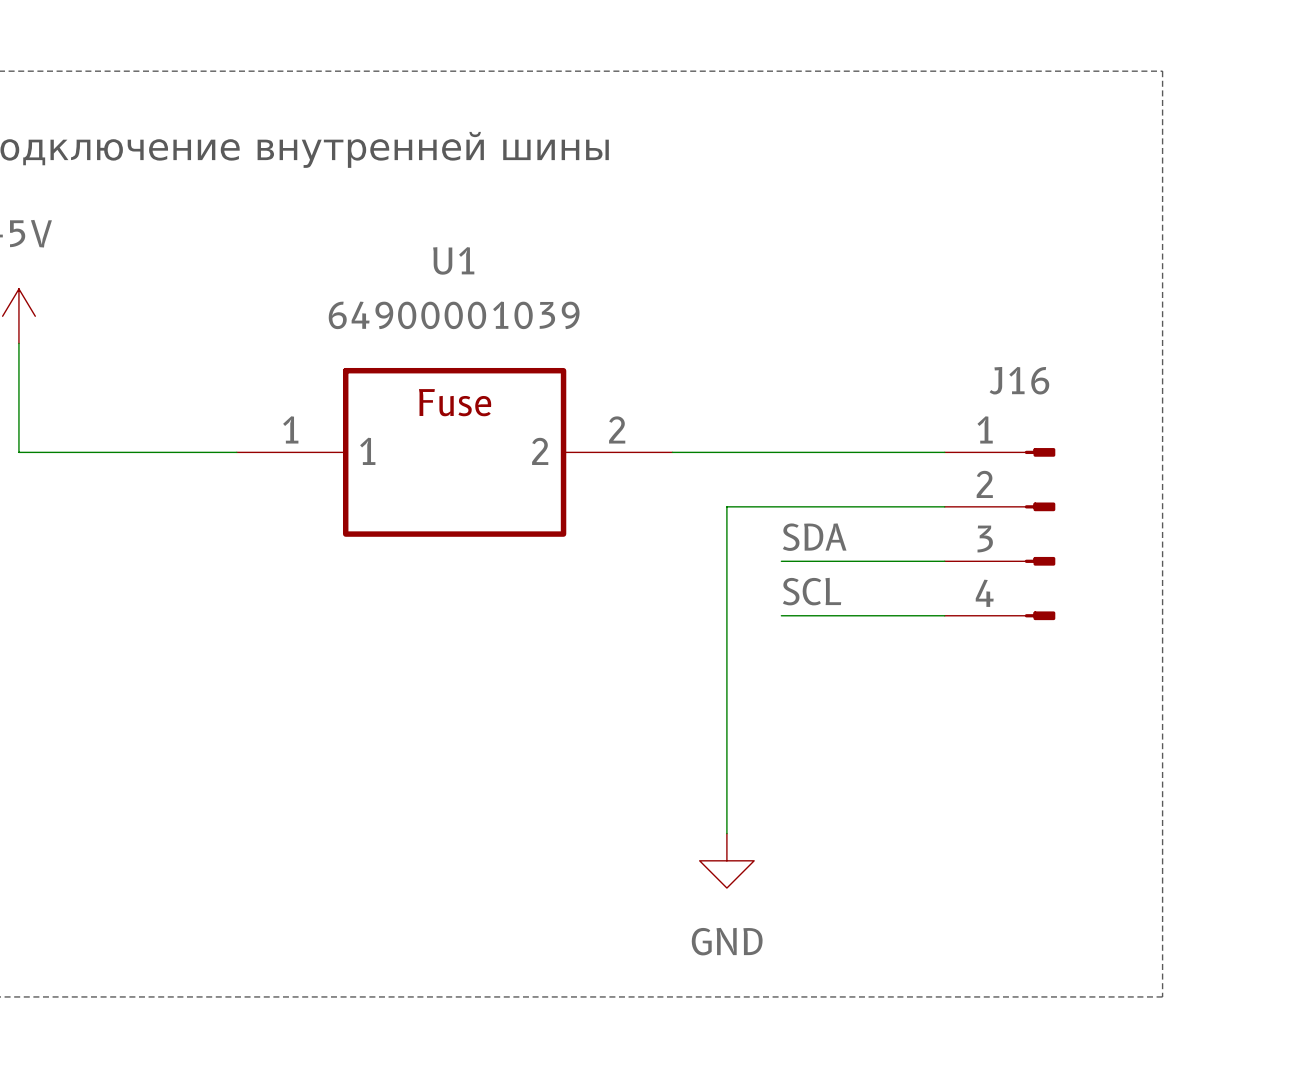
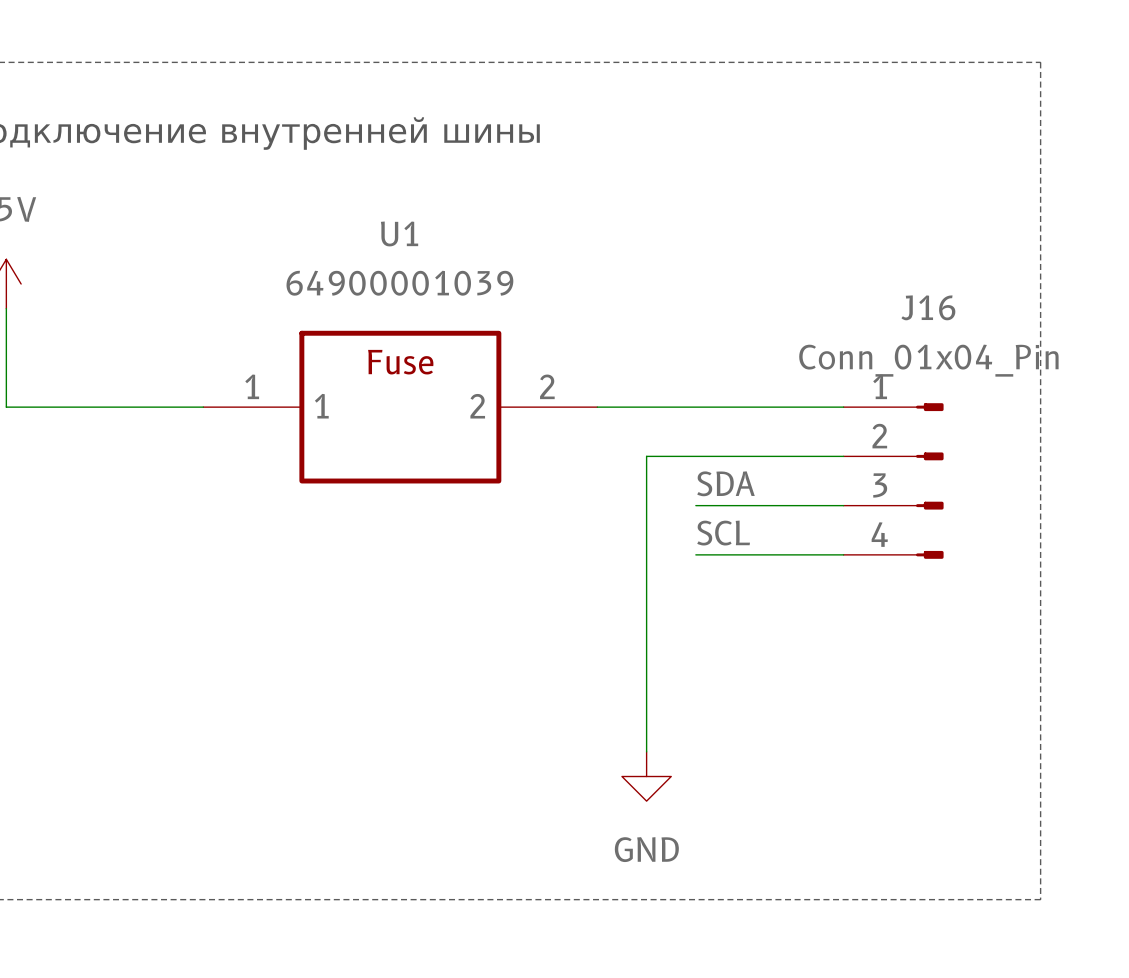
J16 name position: J16 (1019, 380) -> J16 (928, 307)
J16 value: none -> Conn_01x04_Pin (928, 360)

